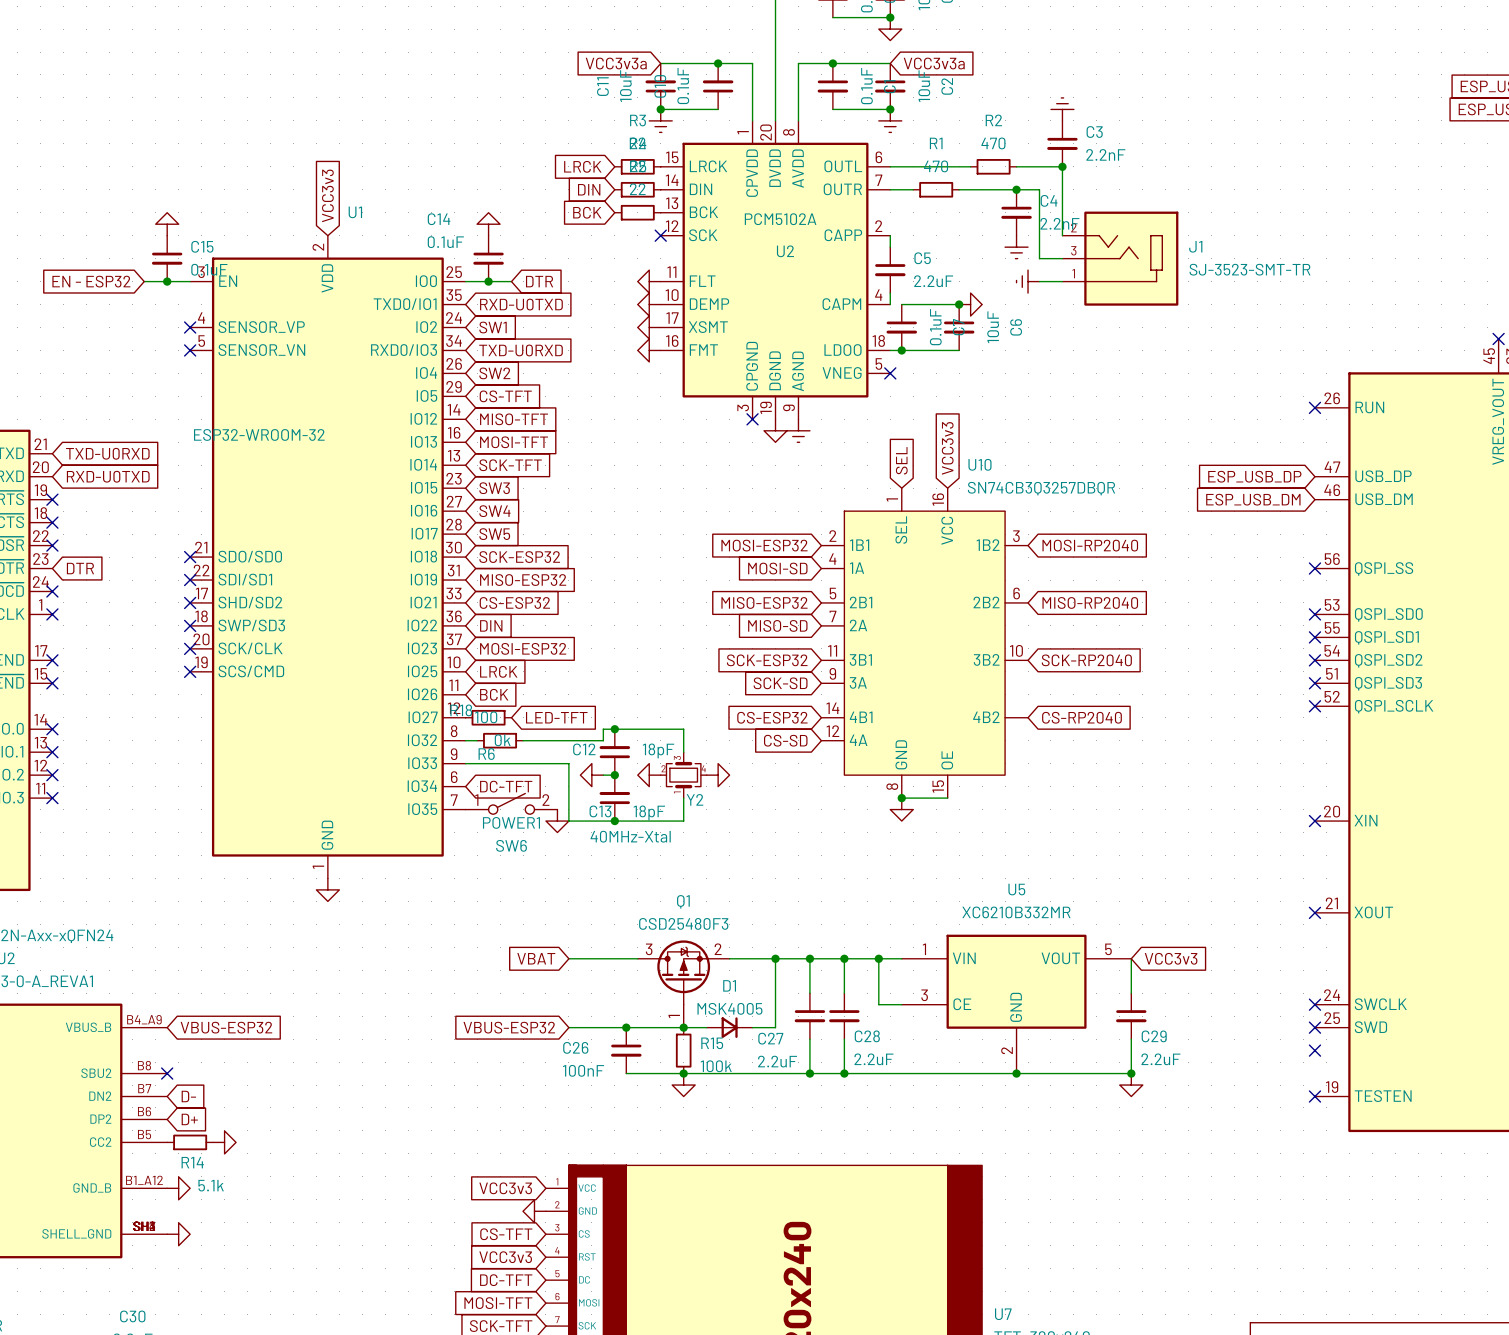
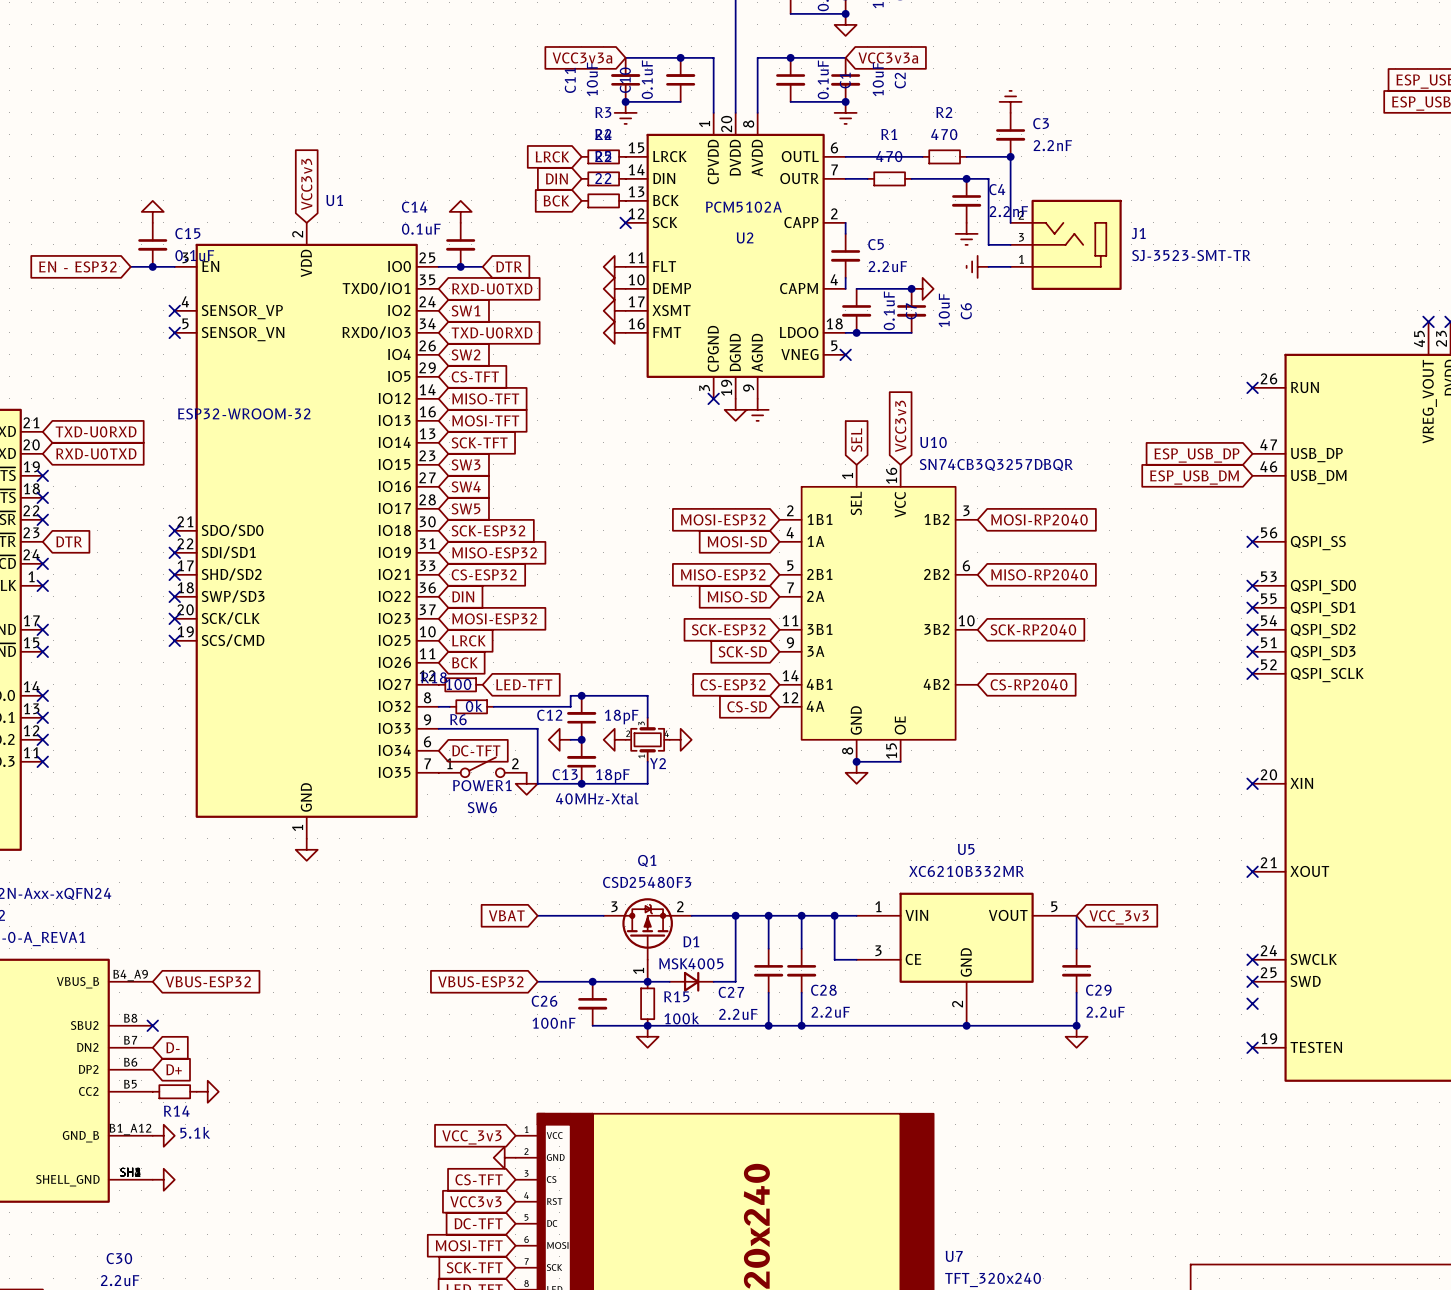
global label: VCC3v3 (1171, 958) -> VCC_3v3 (1119, 917)
global label: VCC3v3 (505, 1188) -> VCC_3v3 (471, 1137)

